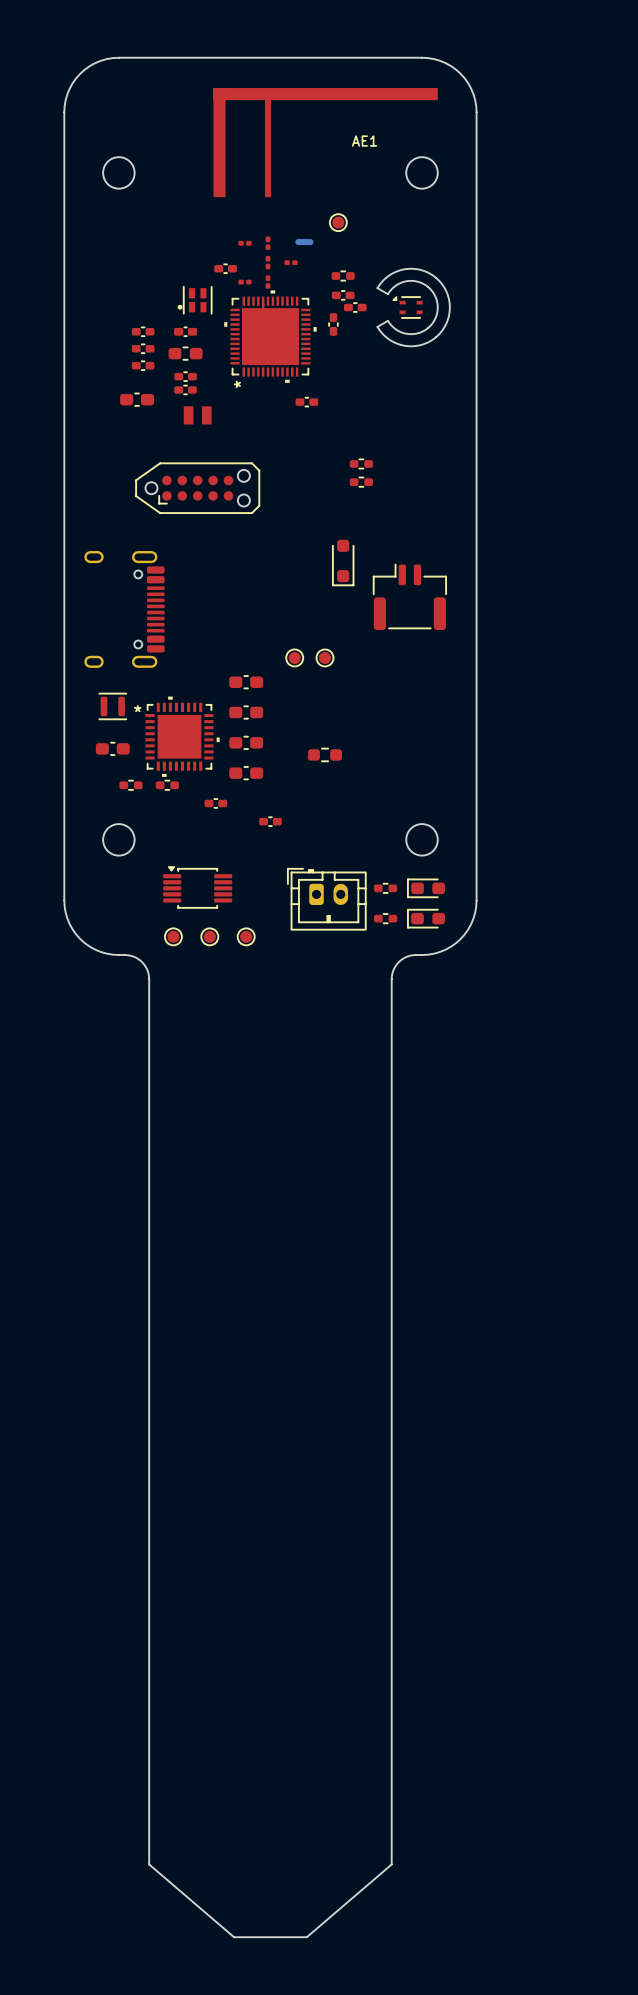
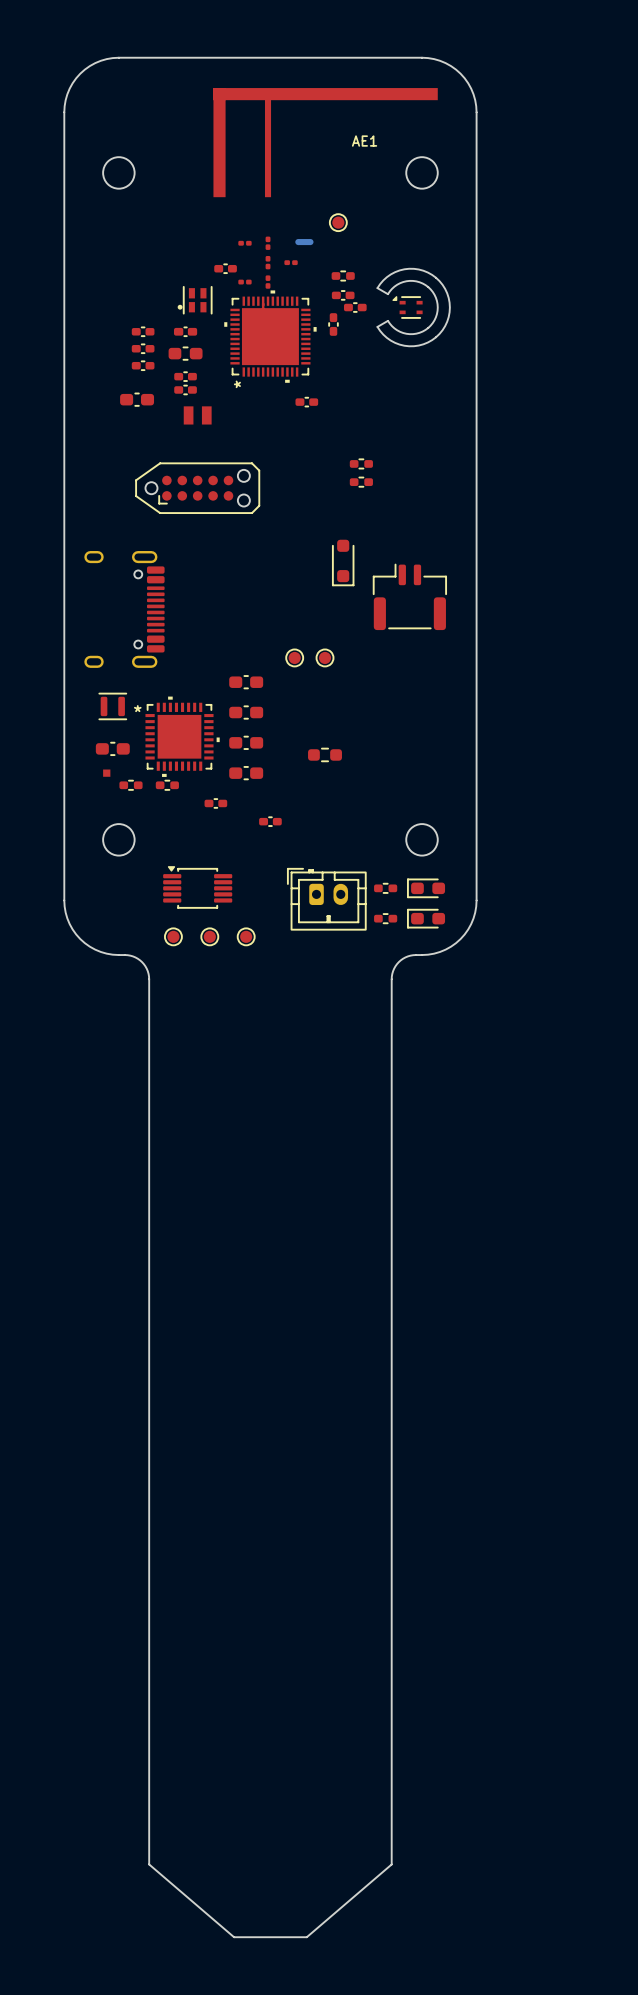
part: none -> (106, 773)

